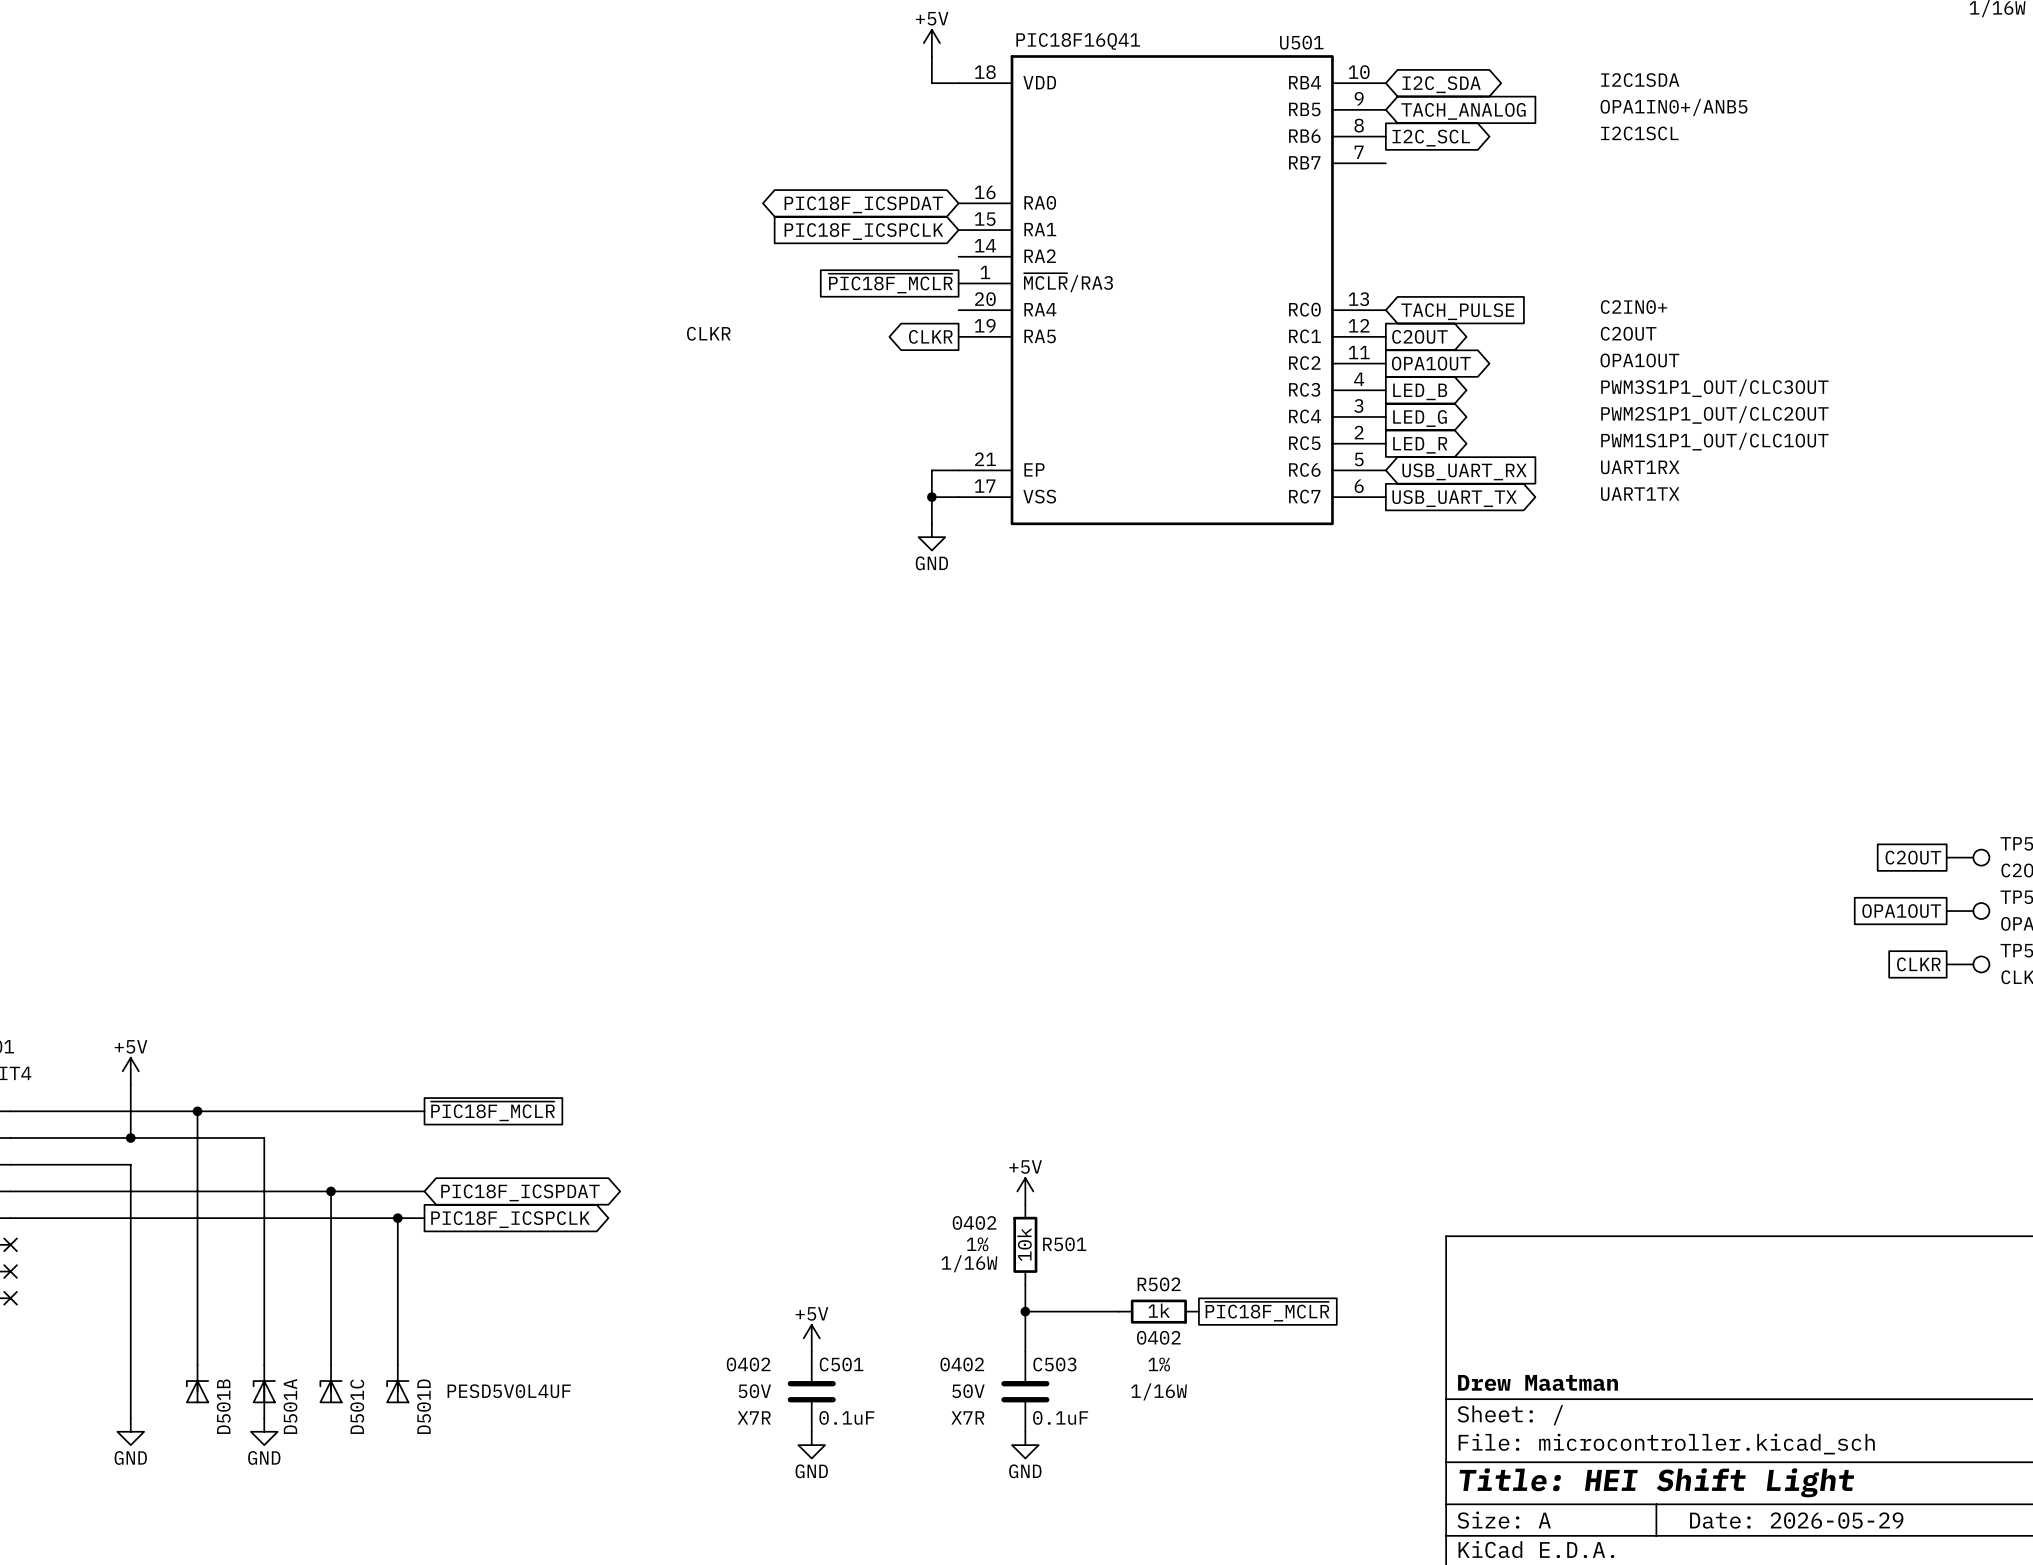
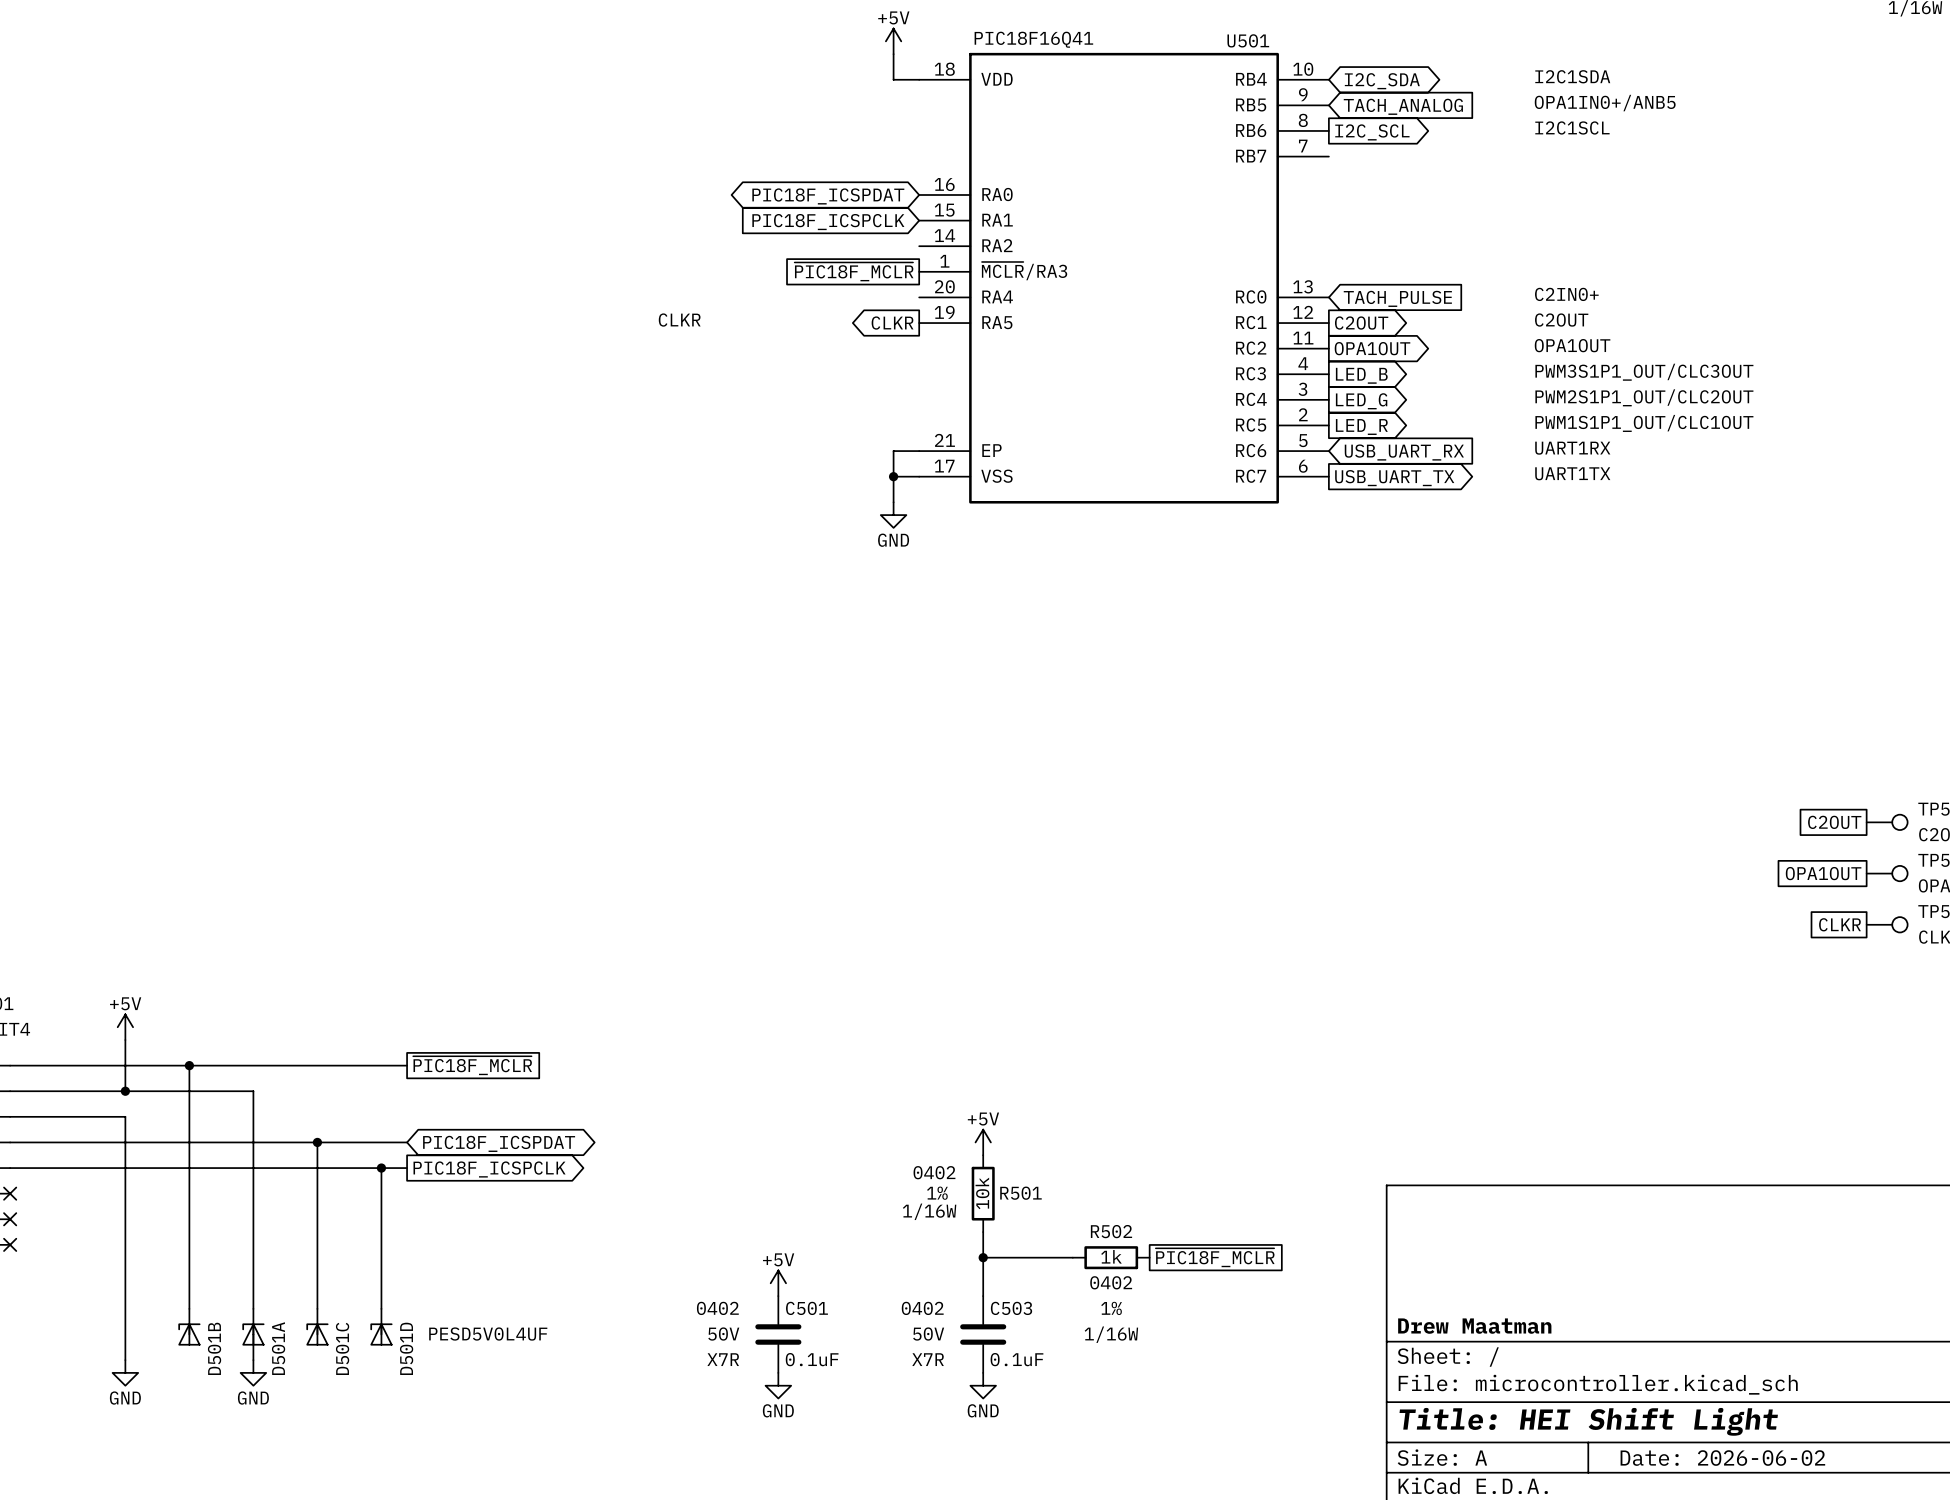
title block: Date: 2026-05-29 (1796, 1520) -> Date: 2026-06-02 (1722, 1458)

